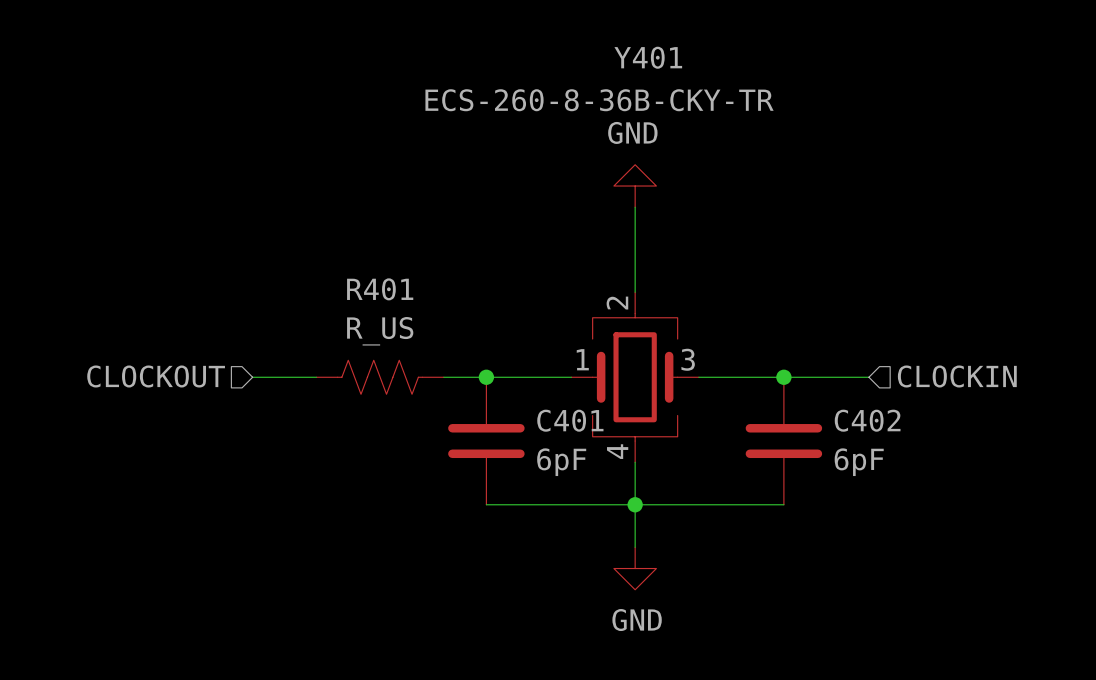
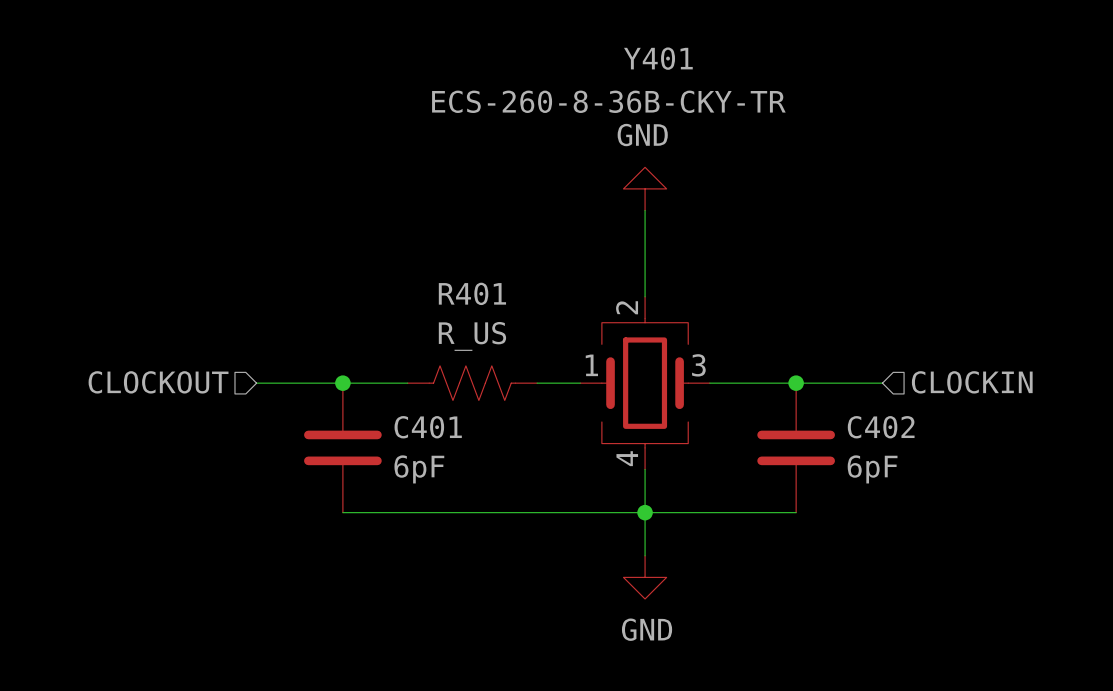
junction: none -> (342, 383)
R401 position: (380, 377) -> (472, 383)
wire: (443, 377) (528, 377) -> (321, 383) (407, 383)
junction: (486, 377) -> none
C401 position: (486, 441) -> (342, 447)
wire: none -> (342, 512) (493, 512)

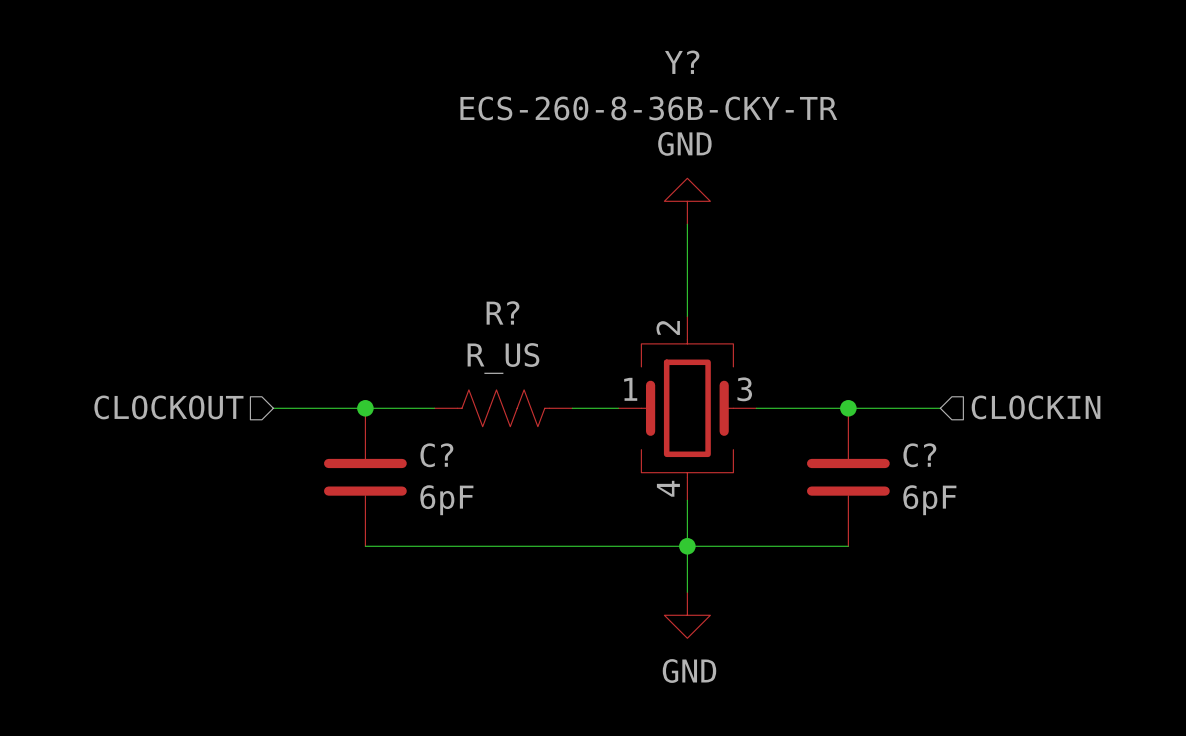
Y401 name: Y401 (658, 58) -> Y? (682, 62)
R401 name: R401 (472, 293) -> R? (503, 312)
C401 name: C401 (428, 427) -> C? (436, 455)
C402 name: C402 (881, 427) -> C? (919, 455)

